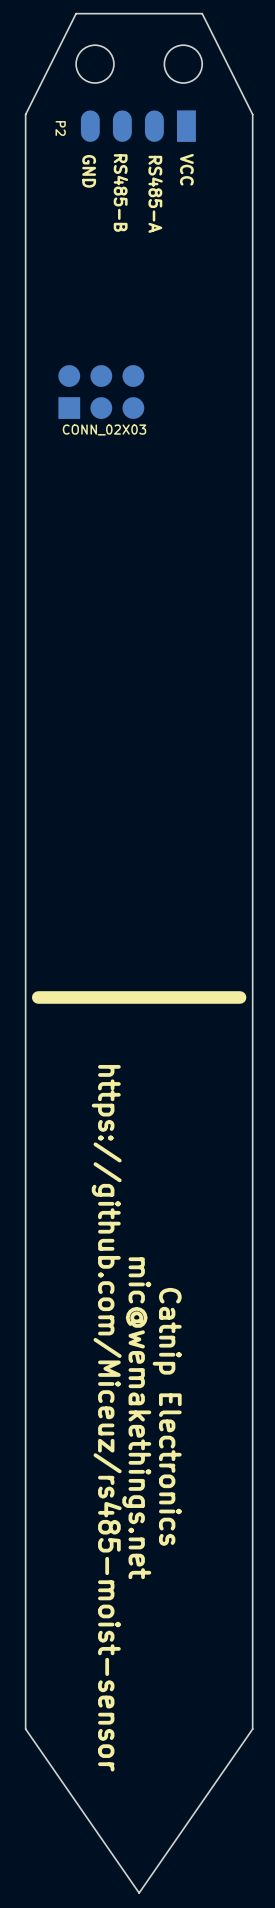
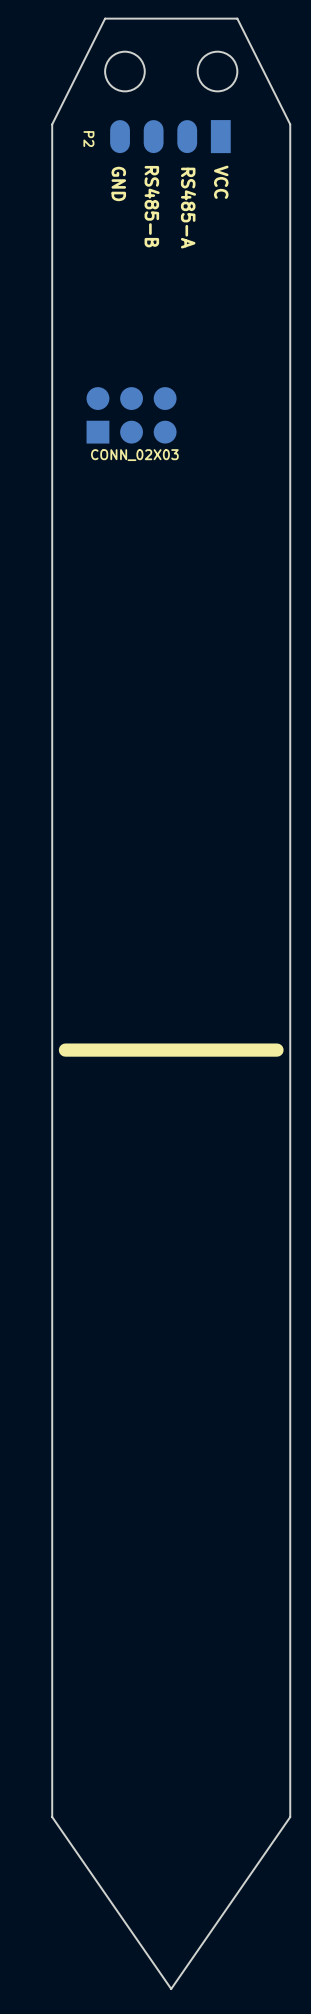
text: Catnip Electronics (167, 1416) -> none
text: https://github.com/Miceuz/rs485-moist-sensor (106, 1418) -> none
text: mic@wemakethings.net (136, 1418) -> none

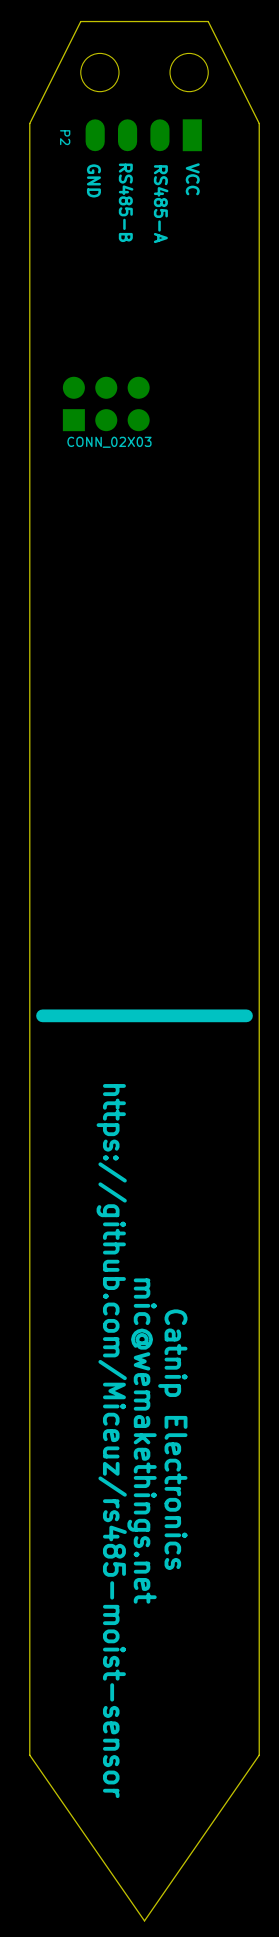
text: none -> Catnip Electronics (172, 1439)
text: none -> https://github.com/Miceuz/rs485-moist-sensor (111, 1441)
text: none -> mic@wemakethings.net (142, 1441)

